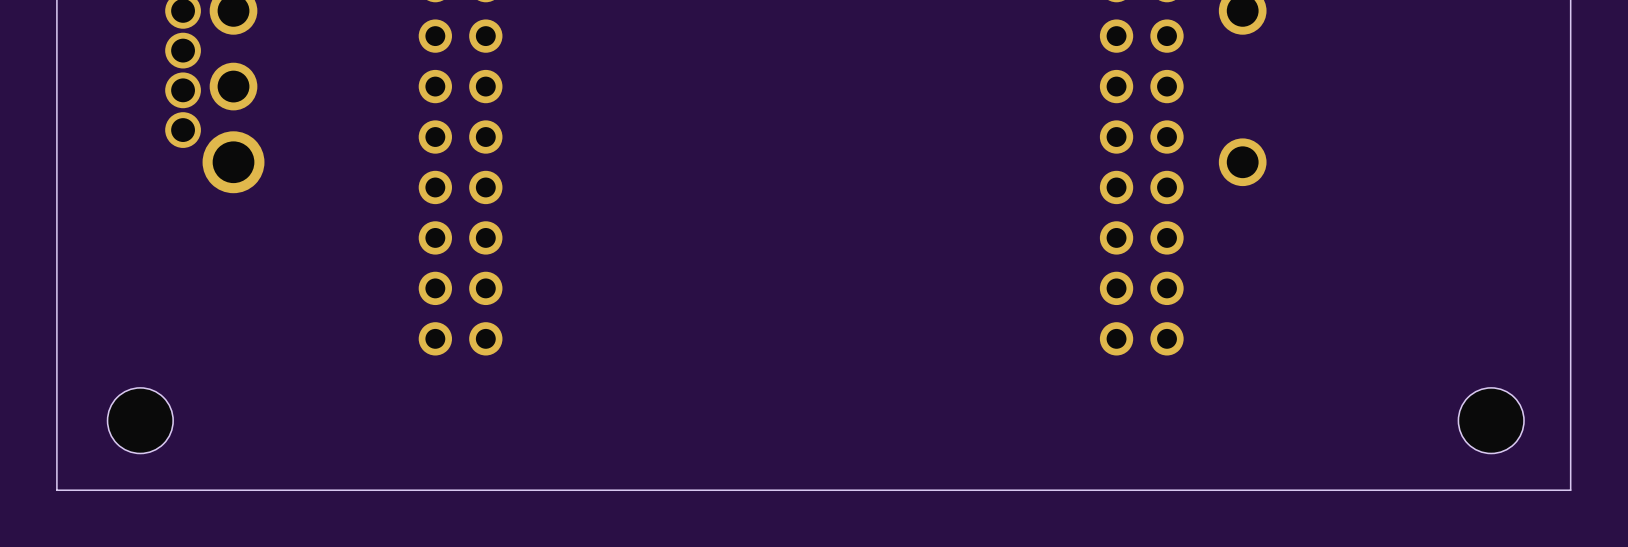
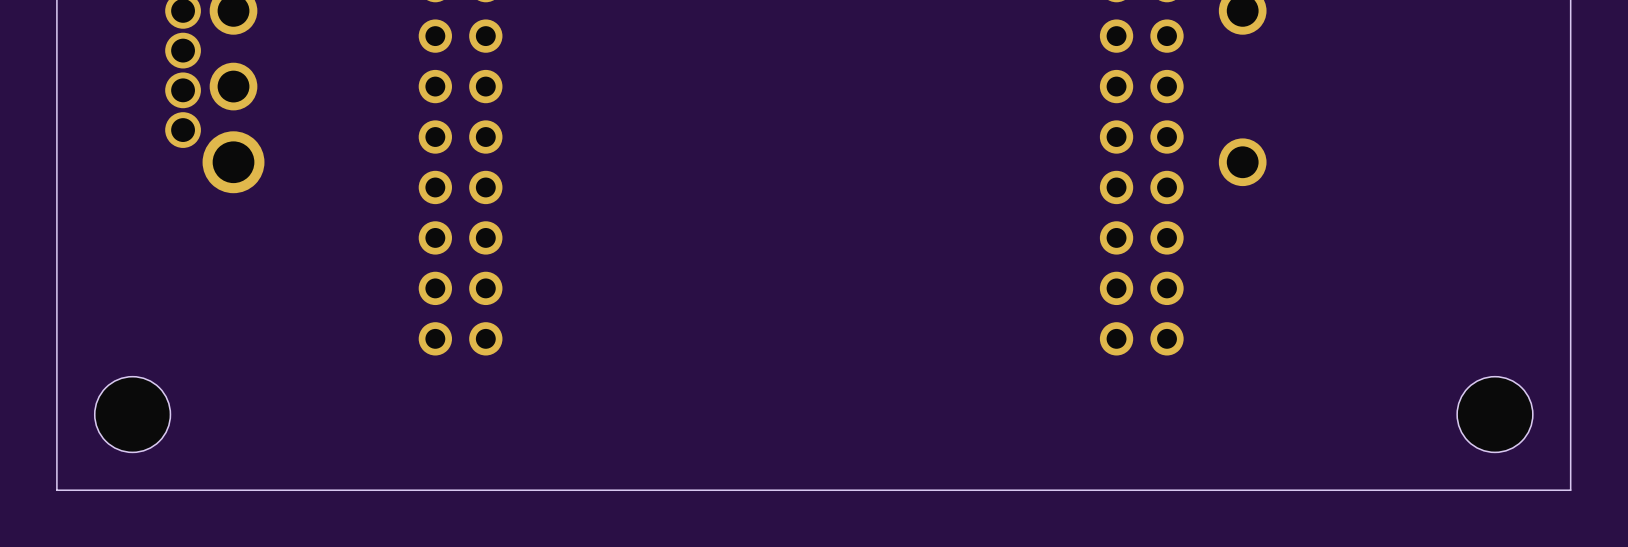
part footprint: [107, 387, 174, 454] -> [94, 376, 171, 453]
part footprint: [1458, 387, 1525, 454] -> [1457, 376, 1533, 453]

